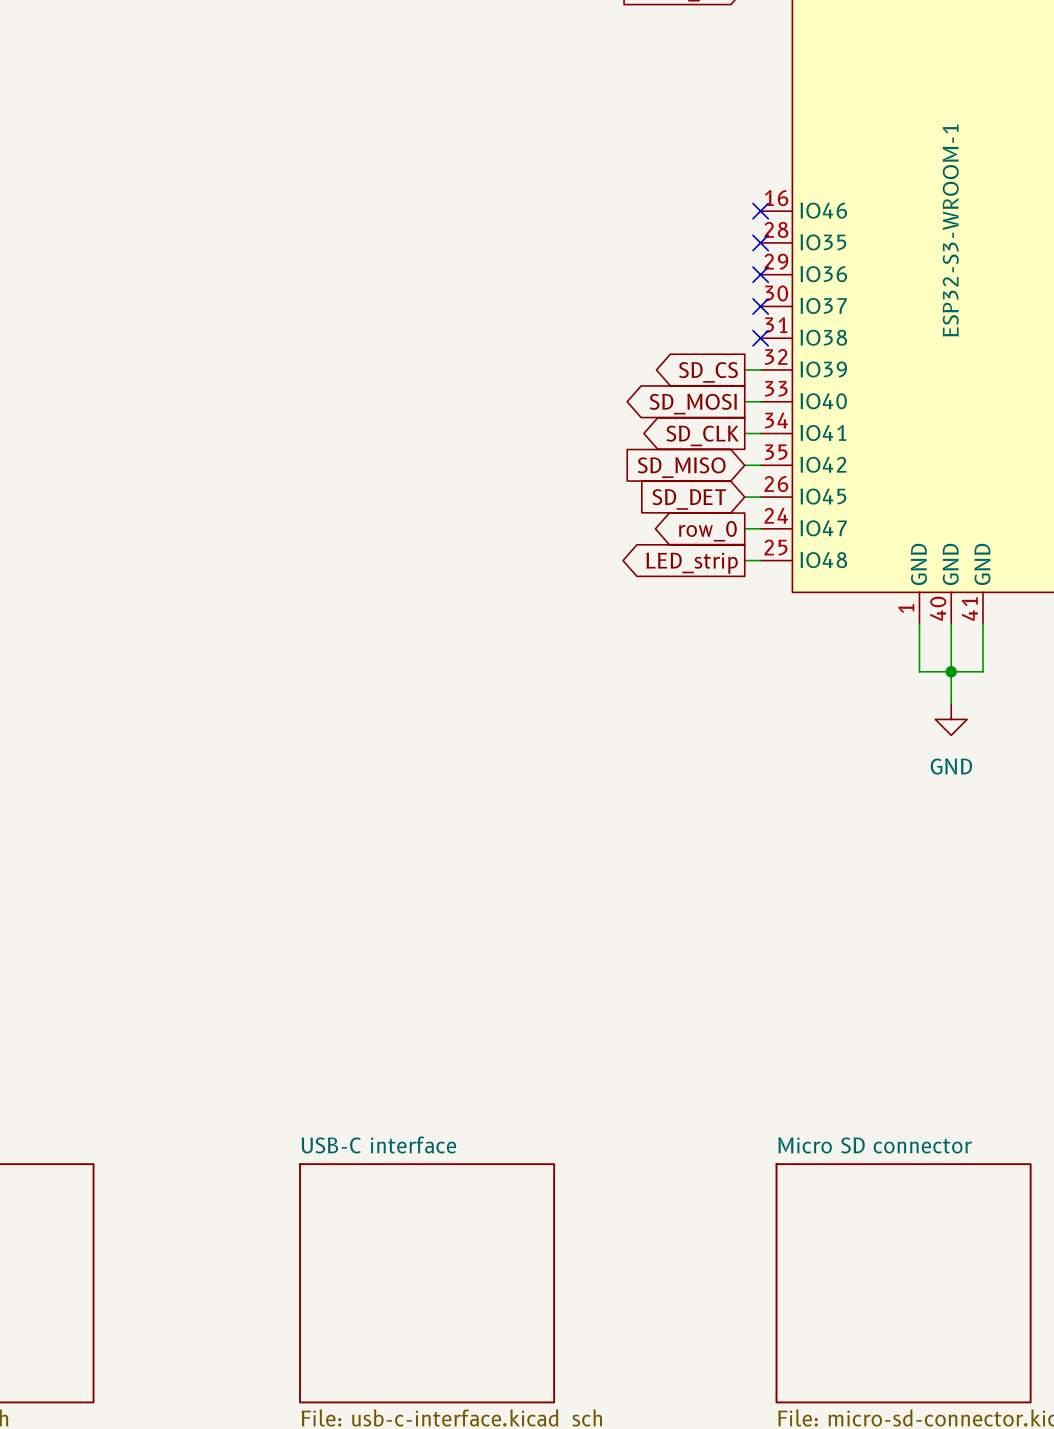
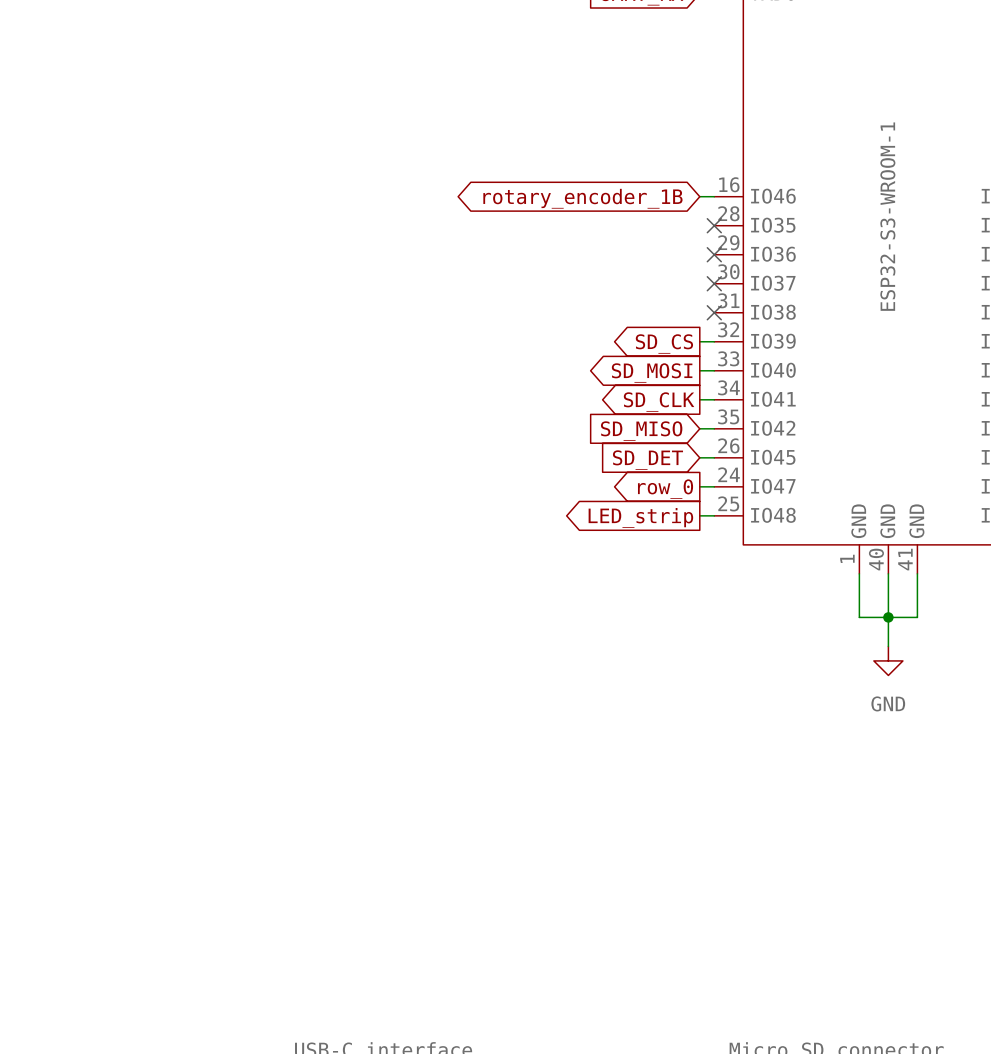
wire: none -> (699, 196) (714, 196)
no-connect mark: (760, 211) -> none
global label: none -> rotary_encoder_1B (582, 198)

